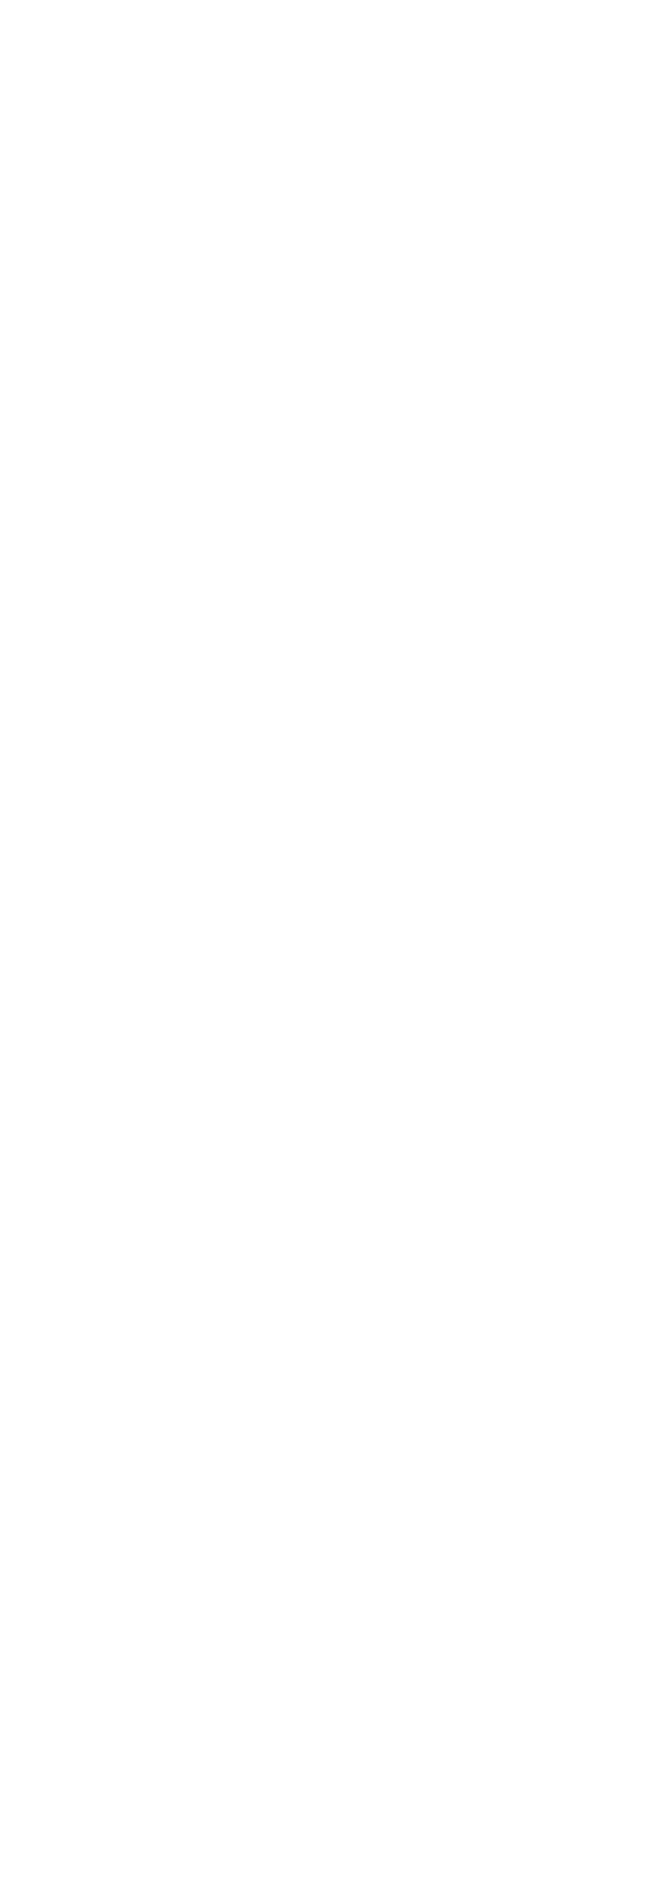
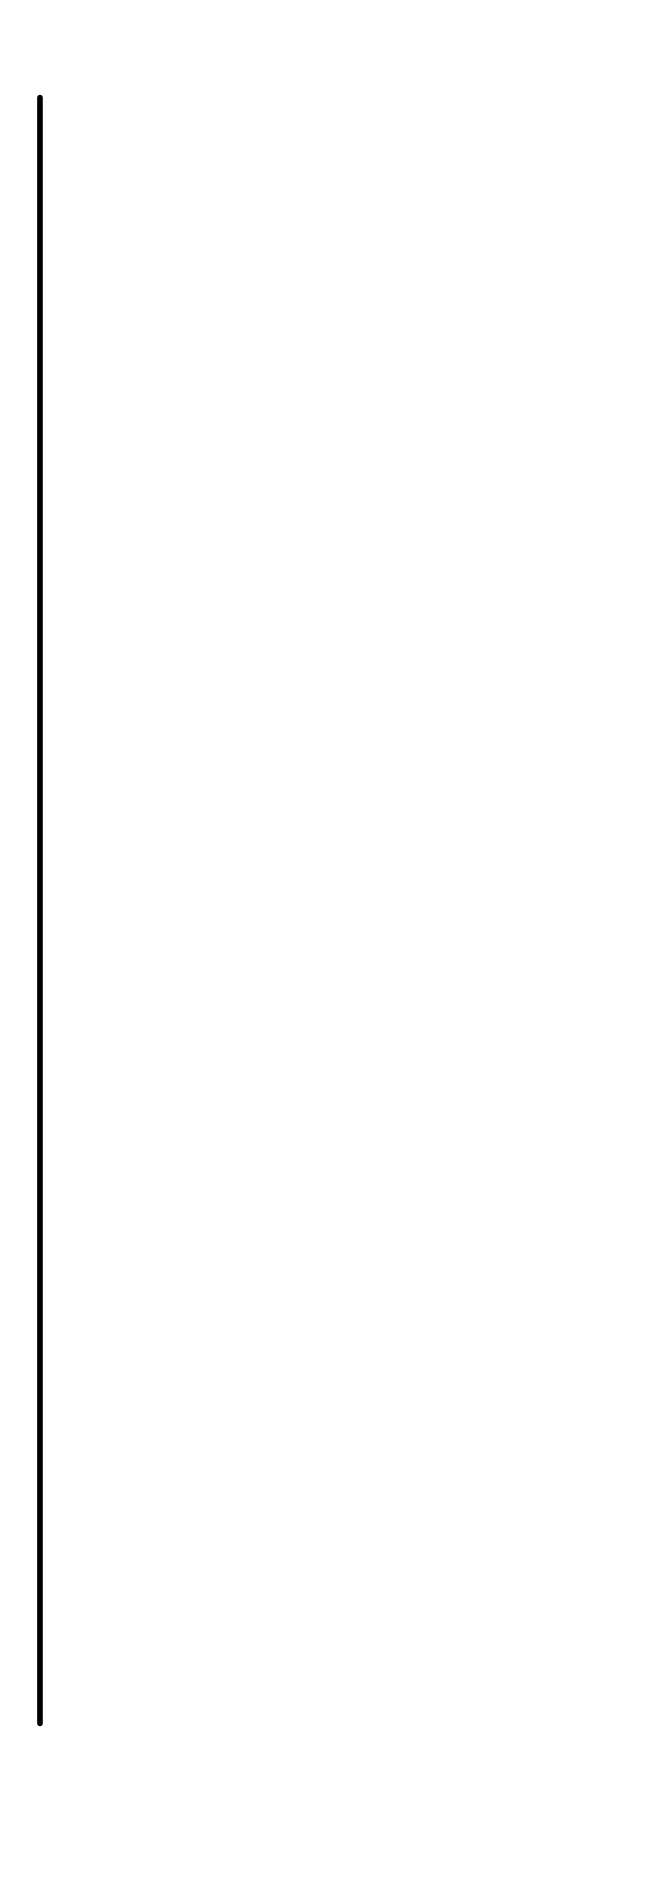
board edge: none -> (39, 97) (39, 1723)

